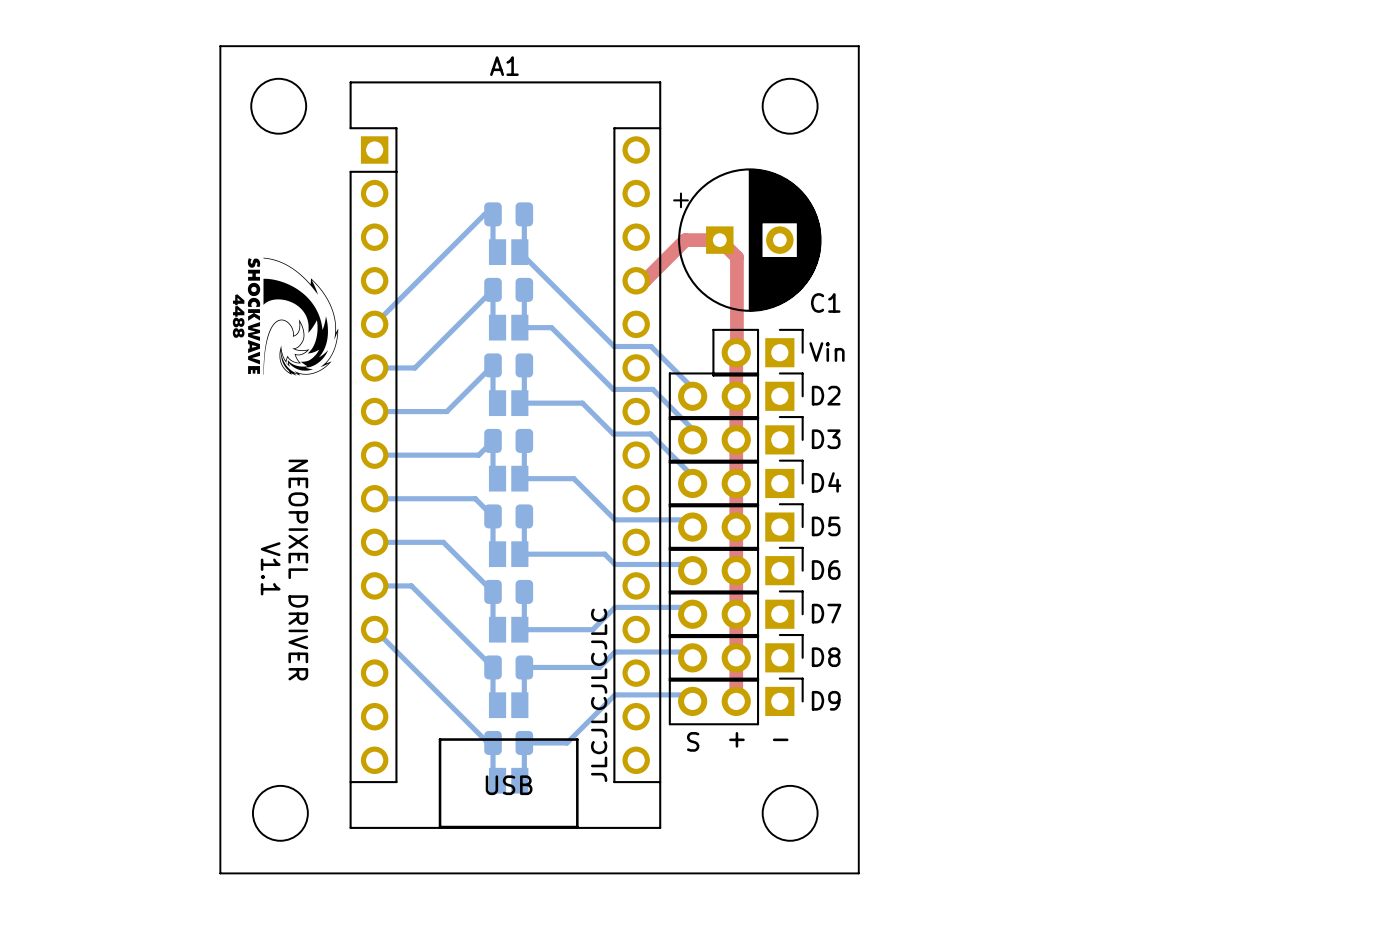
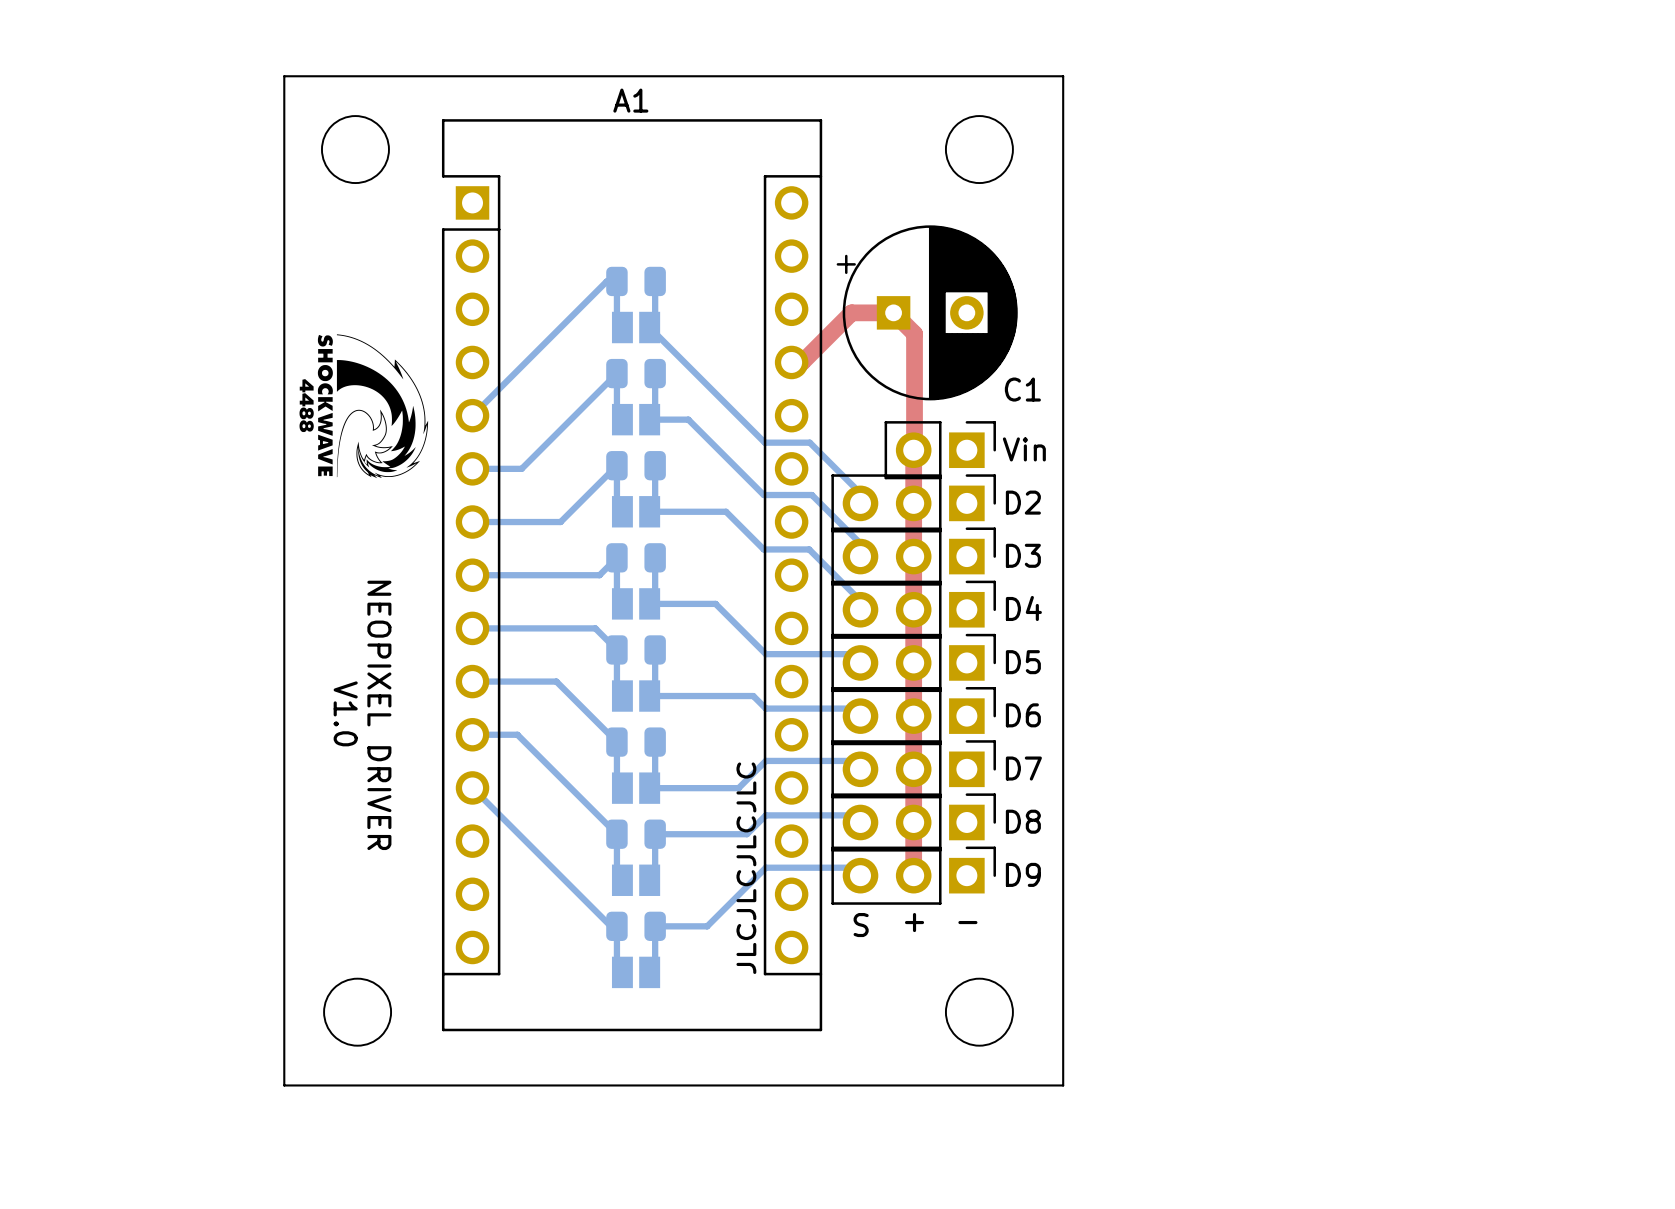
text: V1.1 (270, 568) -> V1.0 (345, 713)
line: (440, 739) (577, 739) (577, 827) (440, 827) (440, 739) -> none
text: USB (509, 785) -> none

